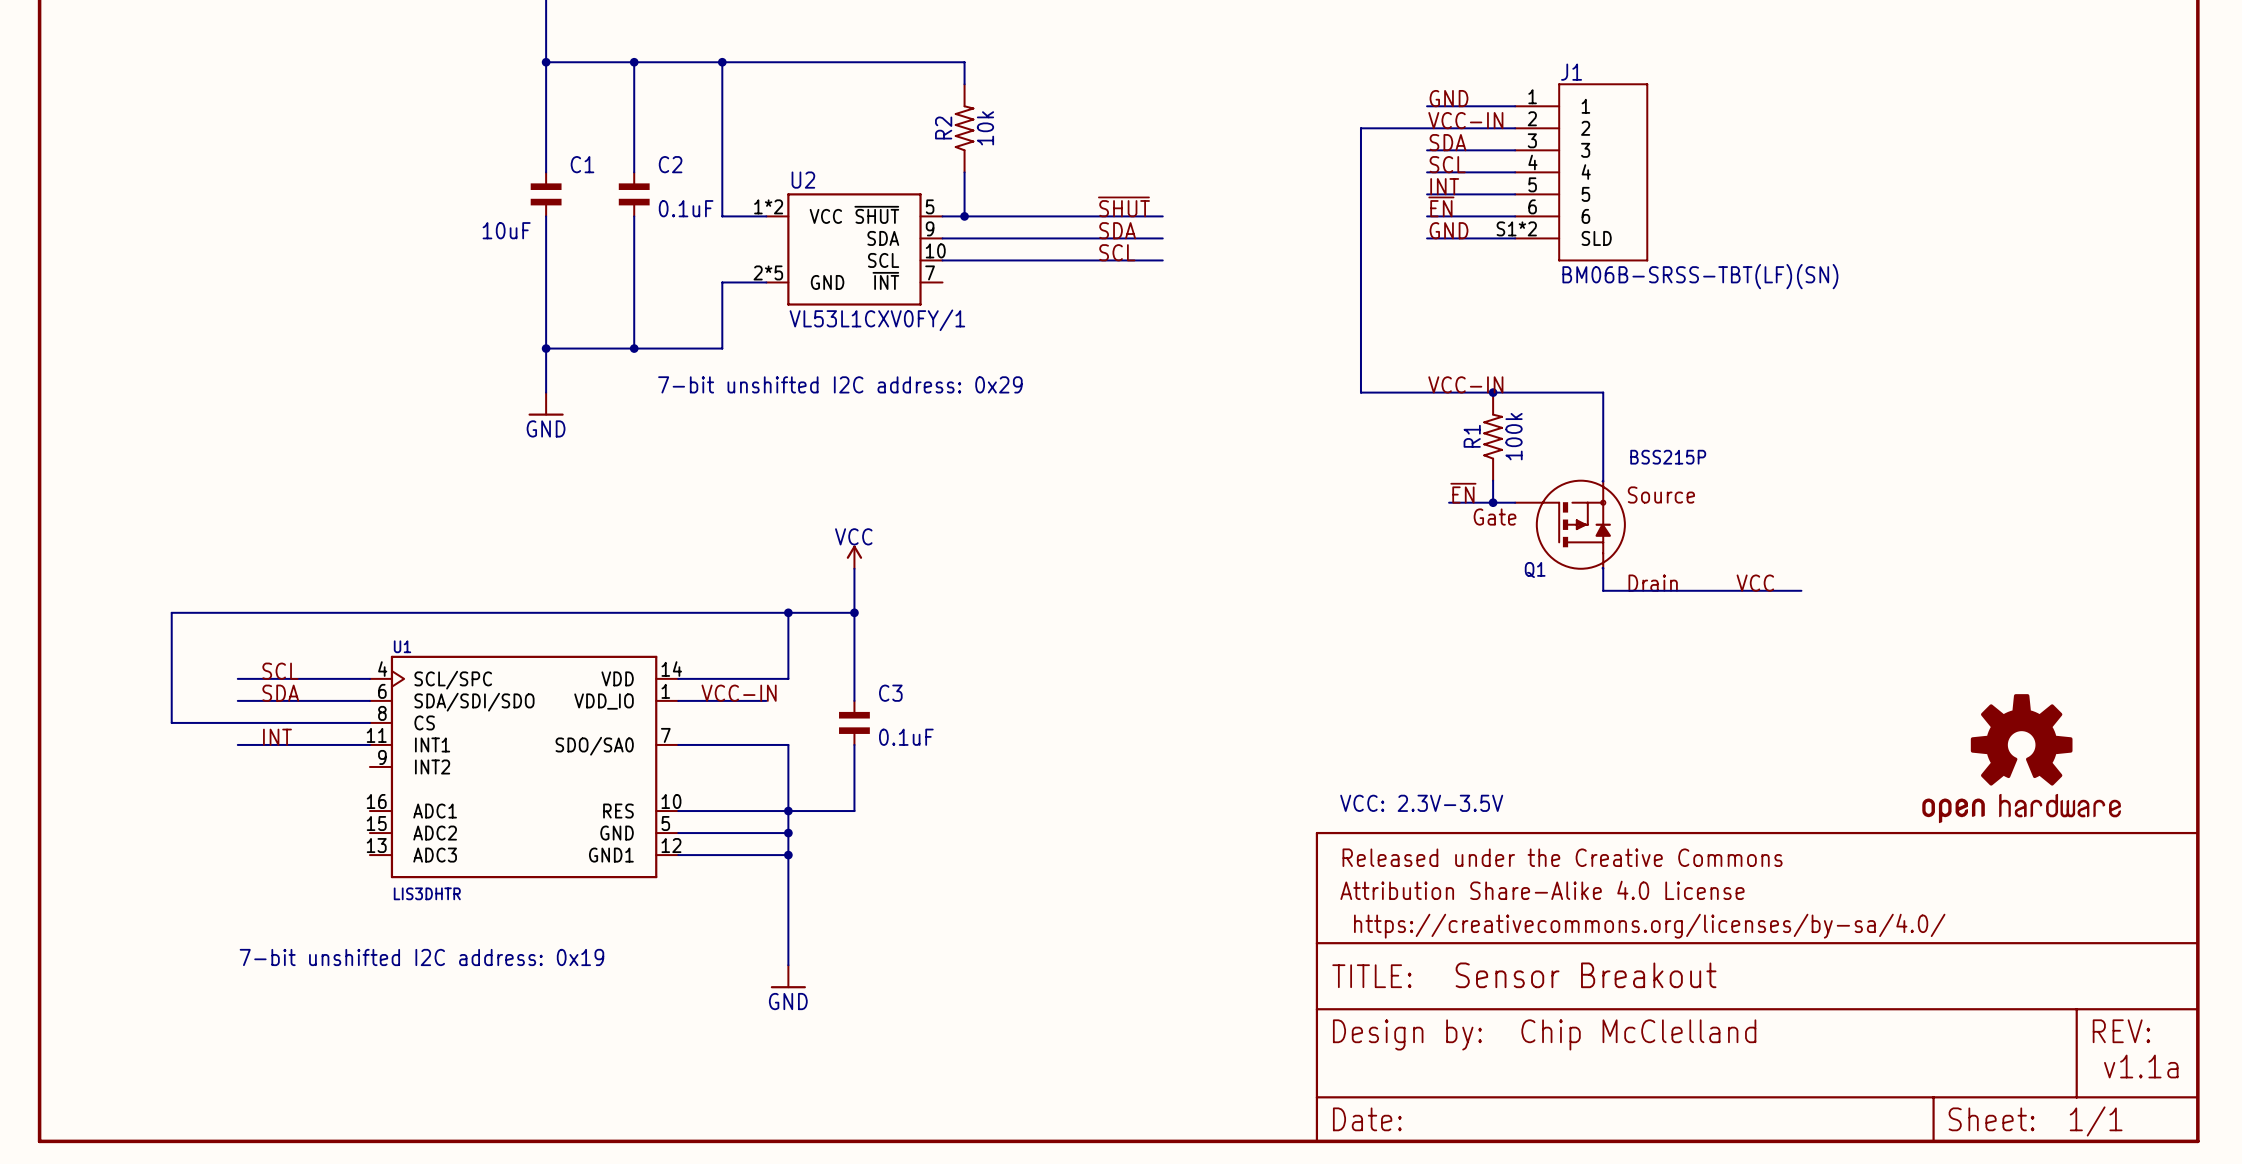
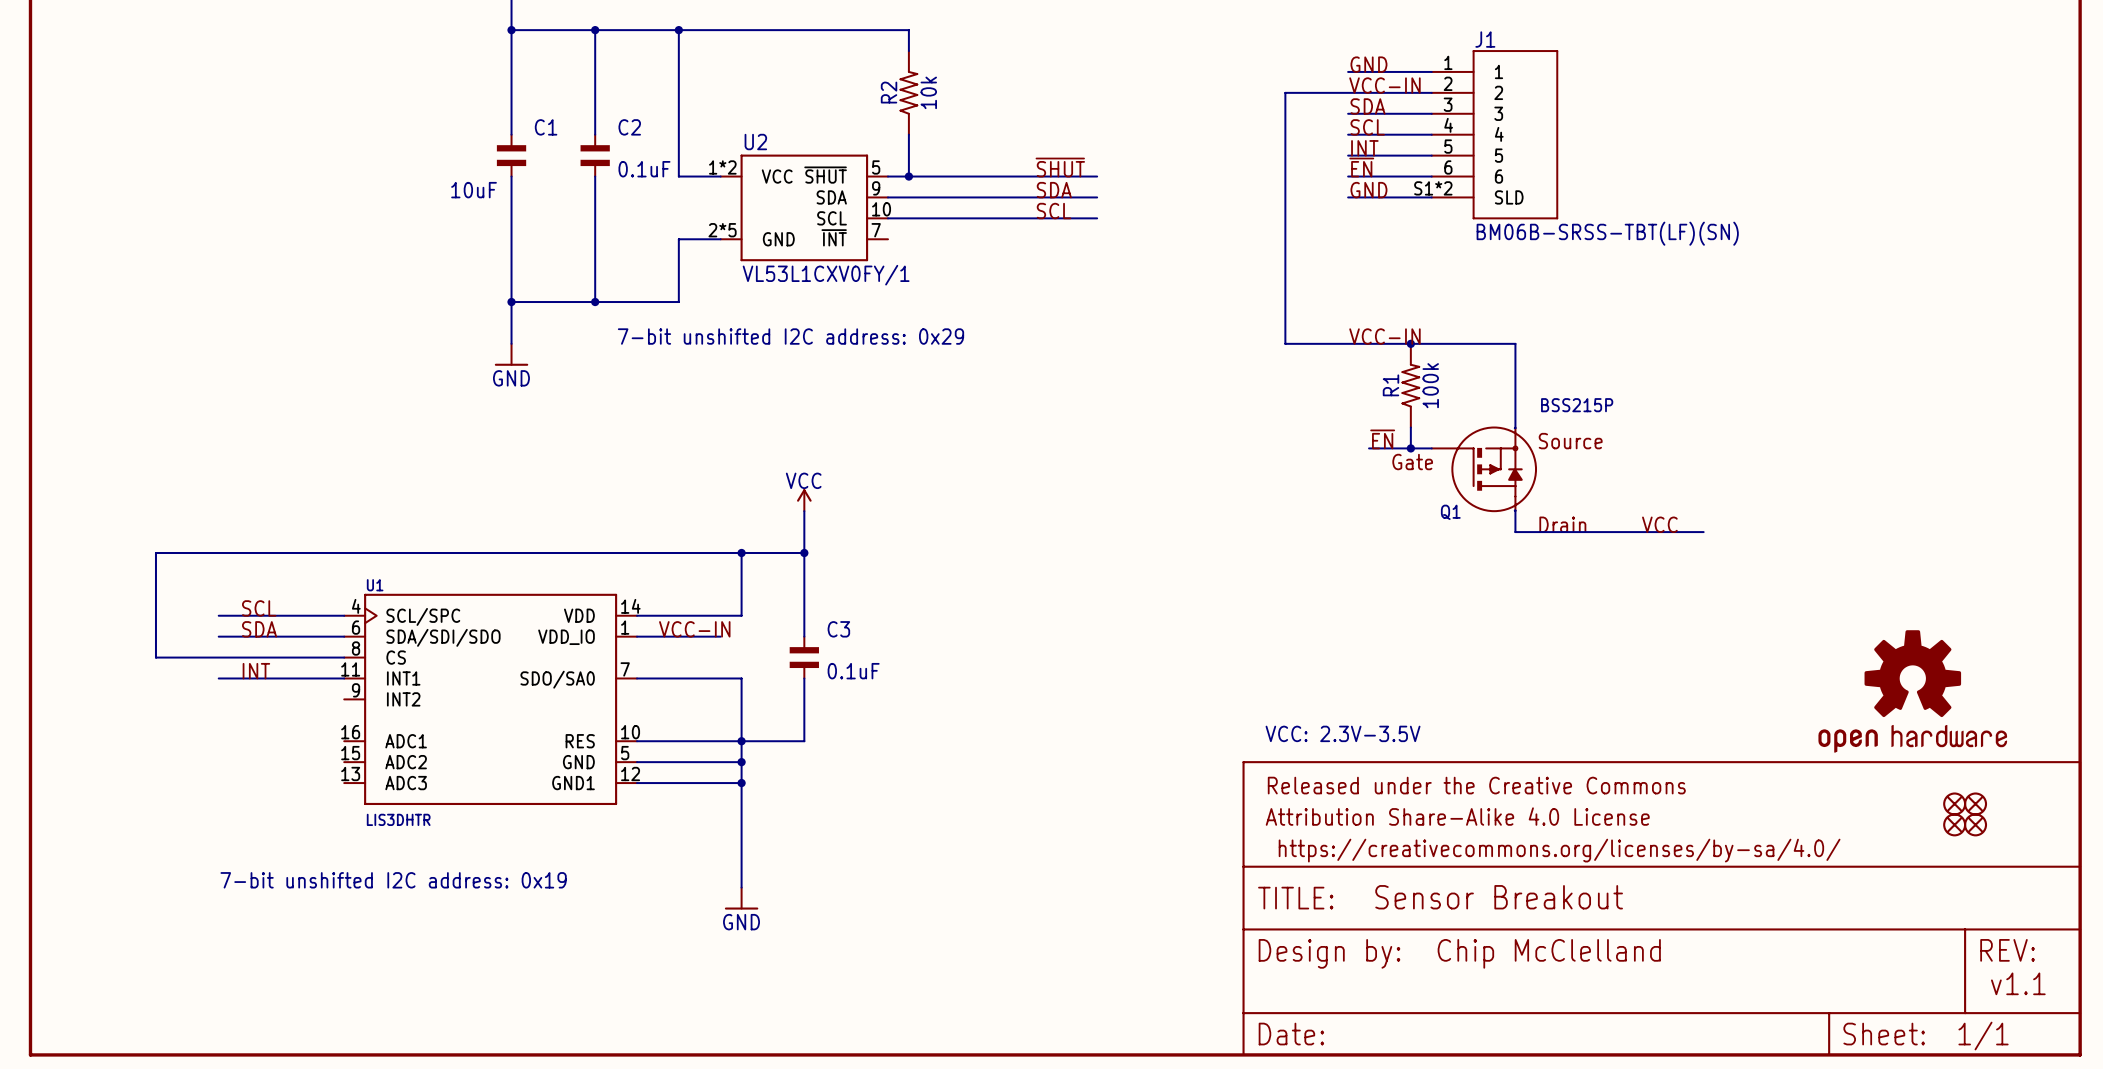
part: none -> (1954, 803)
part: none -> (1975, 803)
part: none -> (1954, 824)
part: none -> (1975, 824)
text: v1.1a (2141, 1066) -> v1.1 (2018, 983)

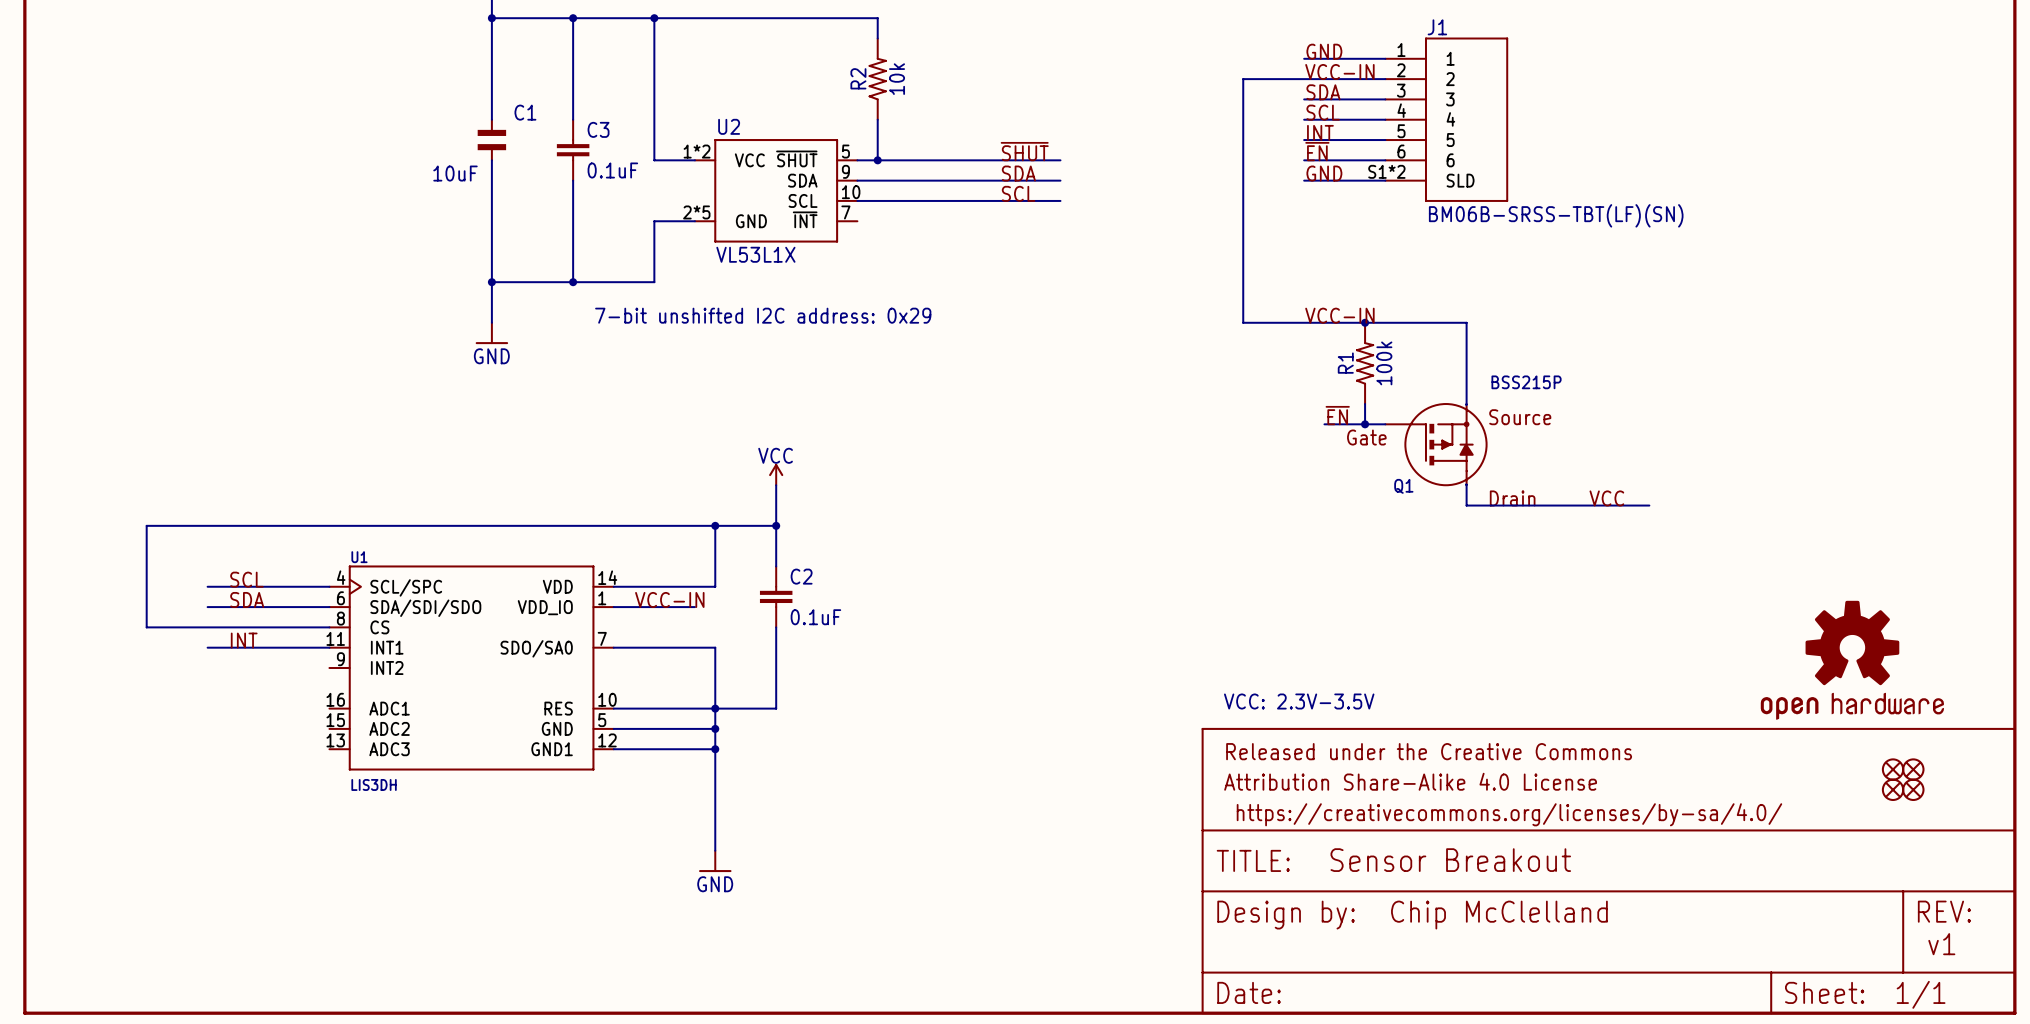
C2 symbol: [580, 134, 610, 178] -> [759, 566, 793, 628]
U2 value: VL53L1CXV0FY/1 (826, 275) -> VL53L1X (755, 254)
C3 symbol: [789, 636, 819, 680] -> [556, 119, 590, 181]
U1 value: LIS3DHTR (398, 819) -> LIS3DH (374, 784)
text: 7-bit unshifted I2C address: 0x19 (393, 880) -> none
text: v1.1 (2018, 983) -> v1 (1941, 944)

